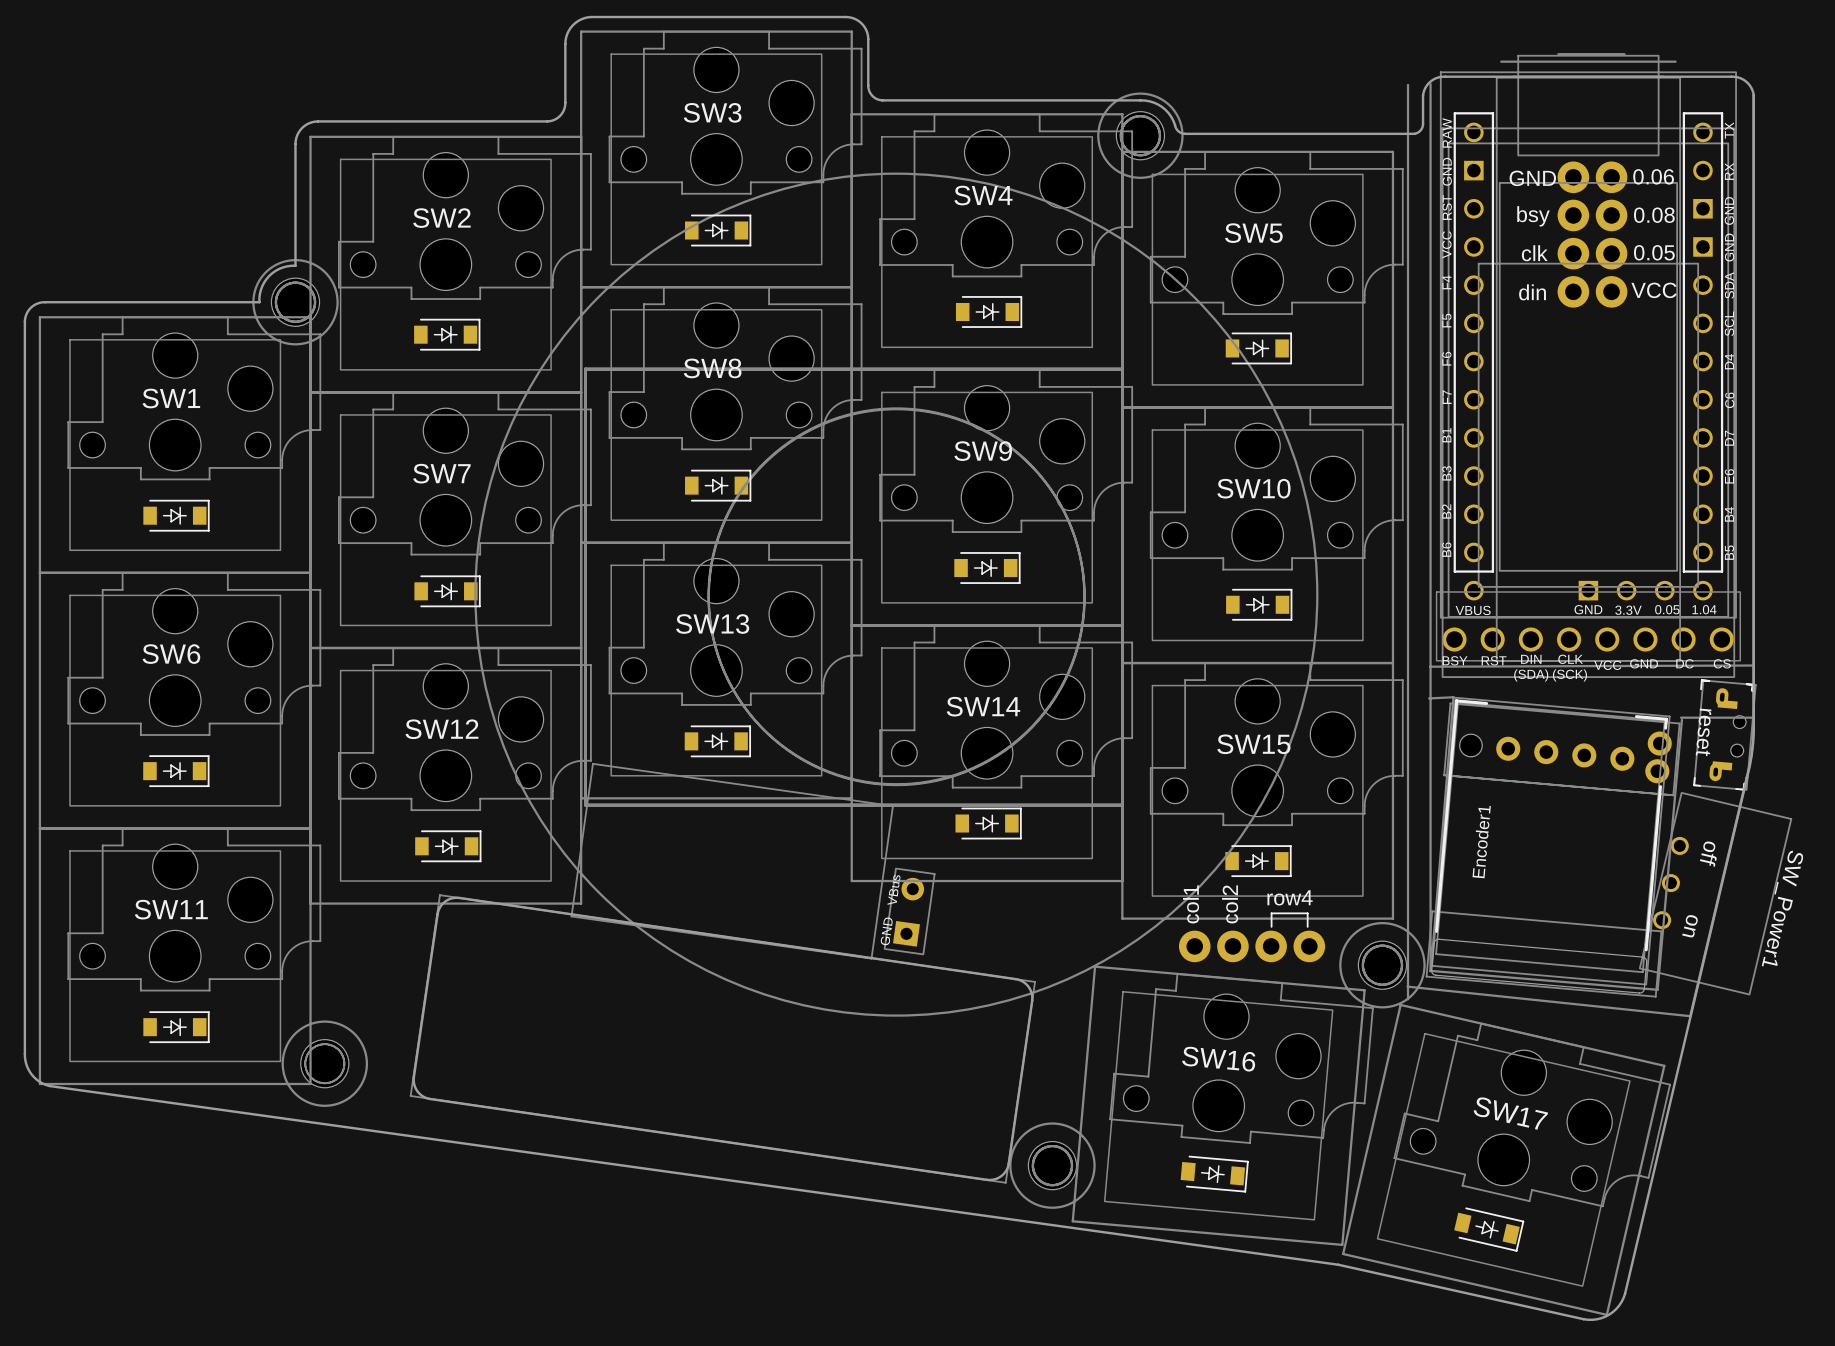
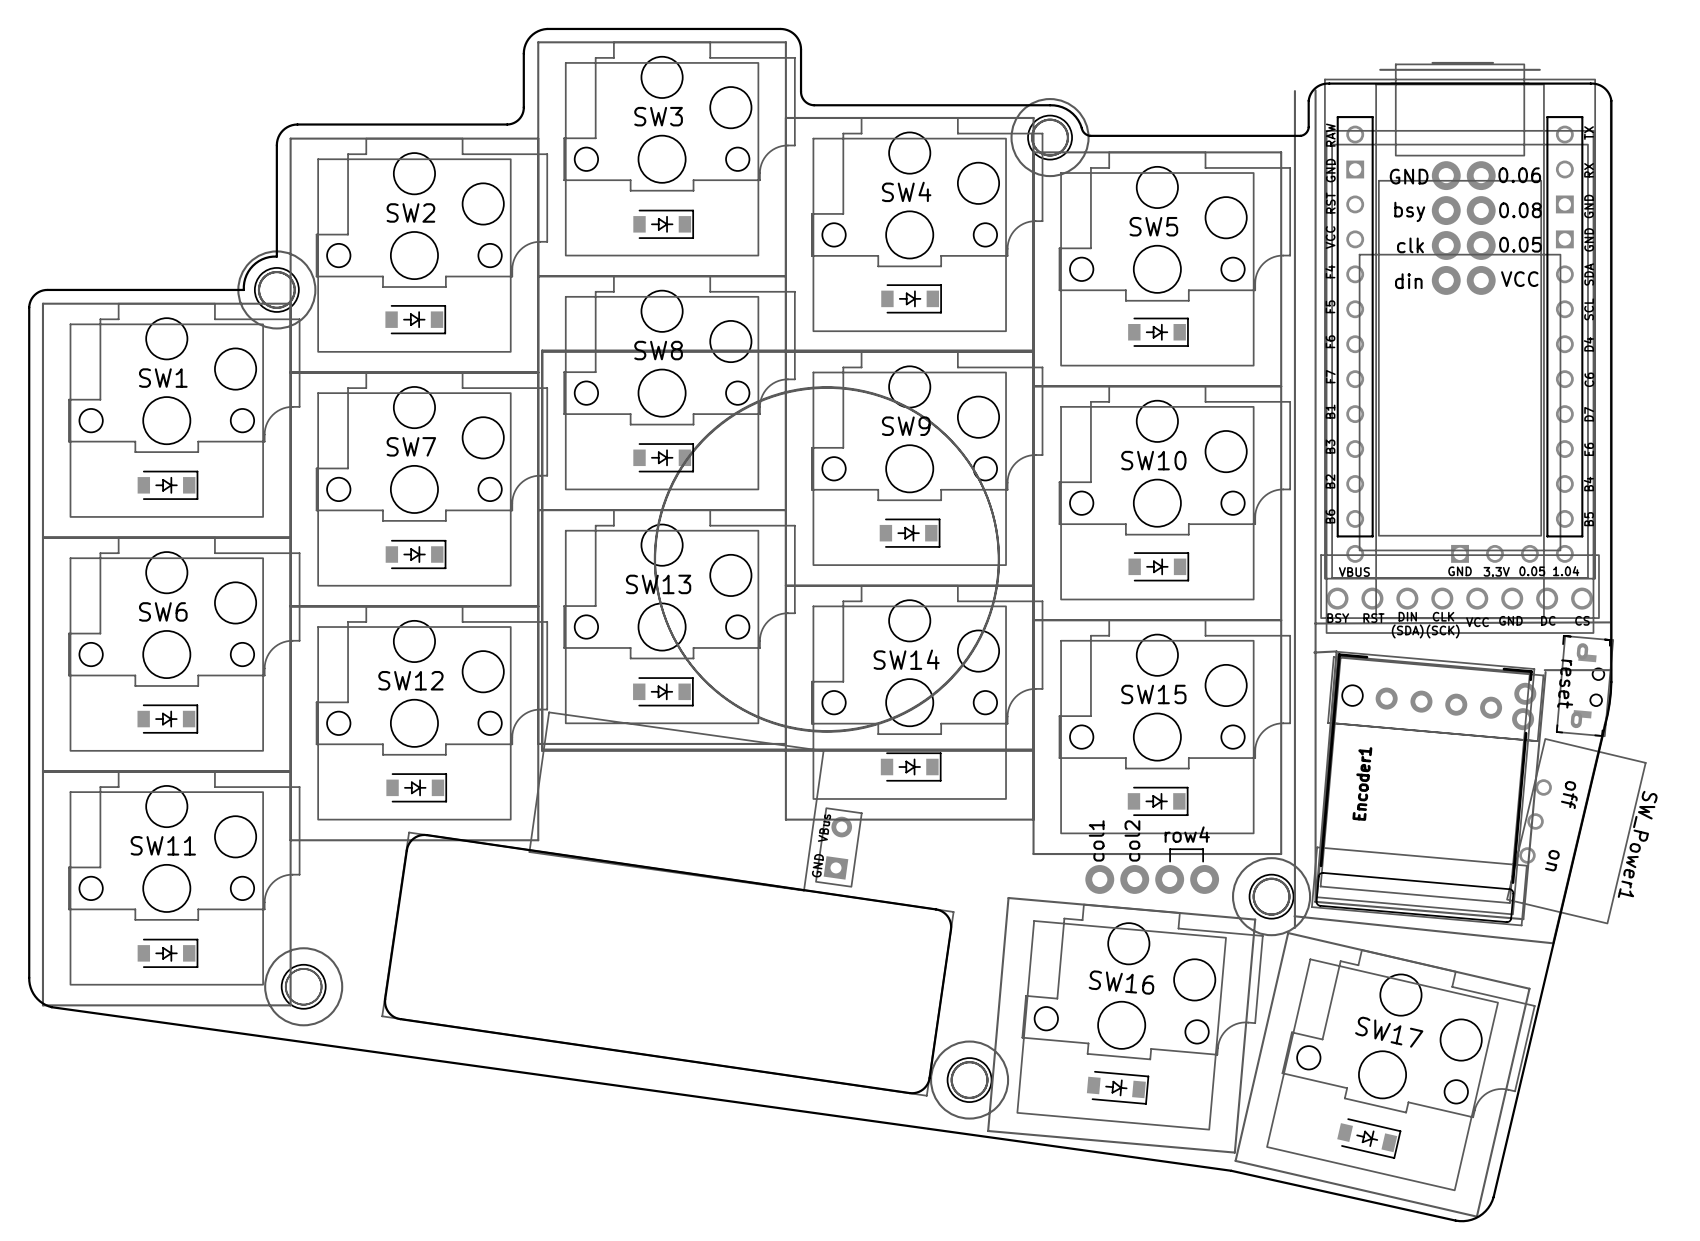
drawing: [474, 172, 1319, 1017] -> none

